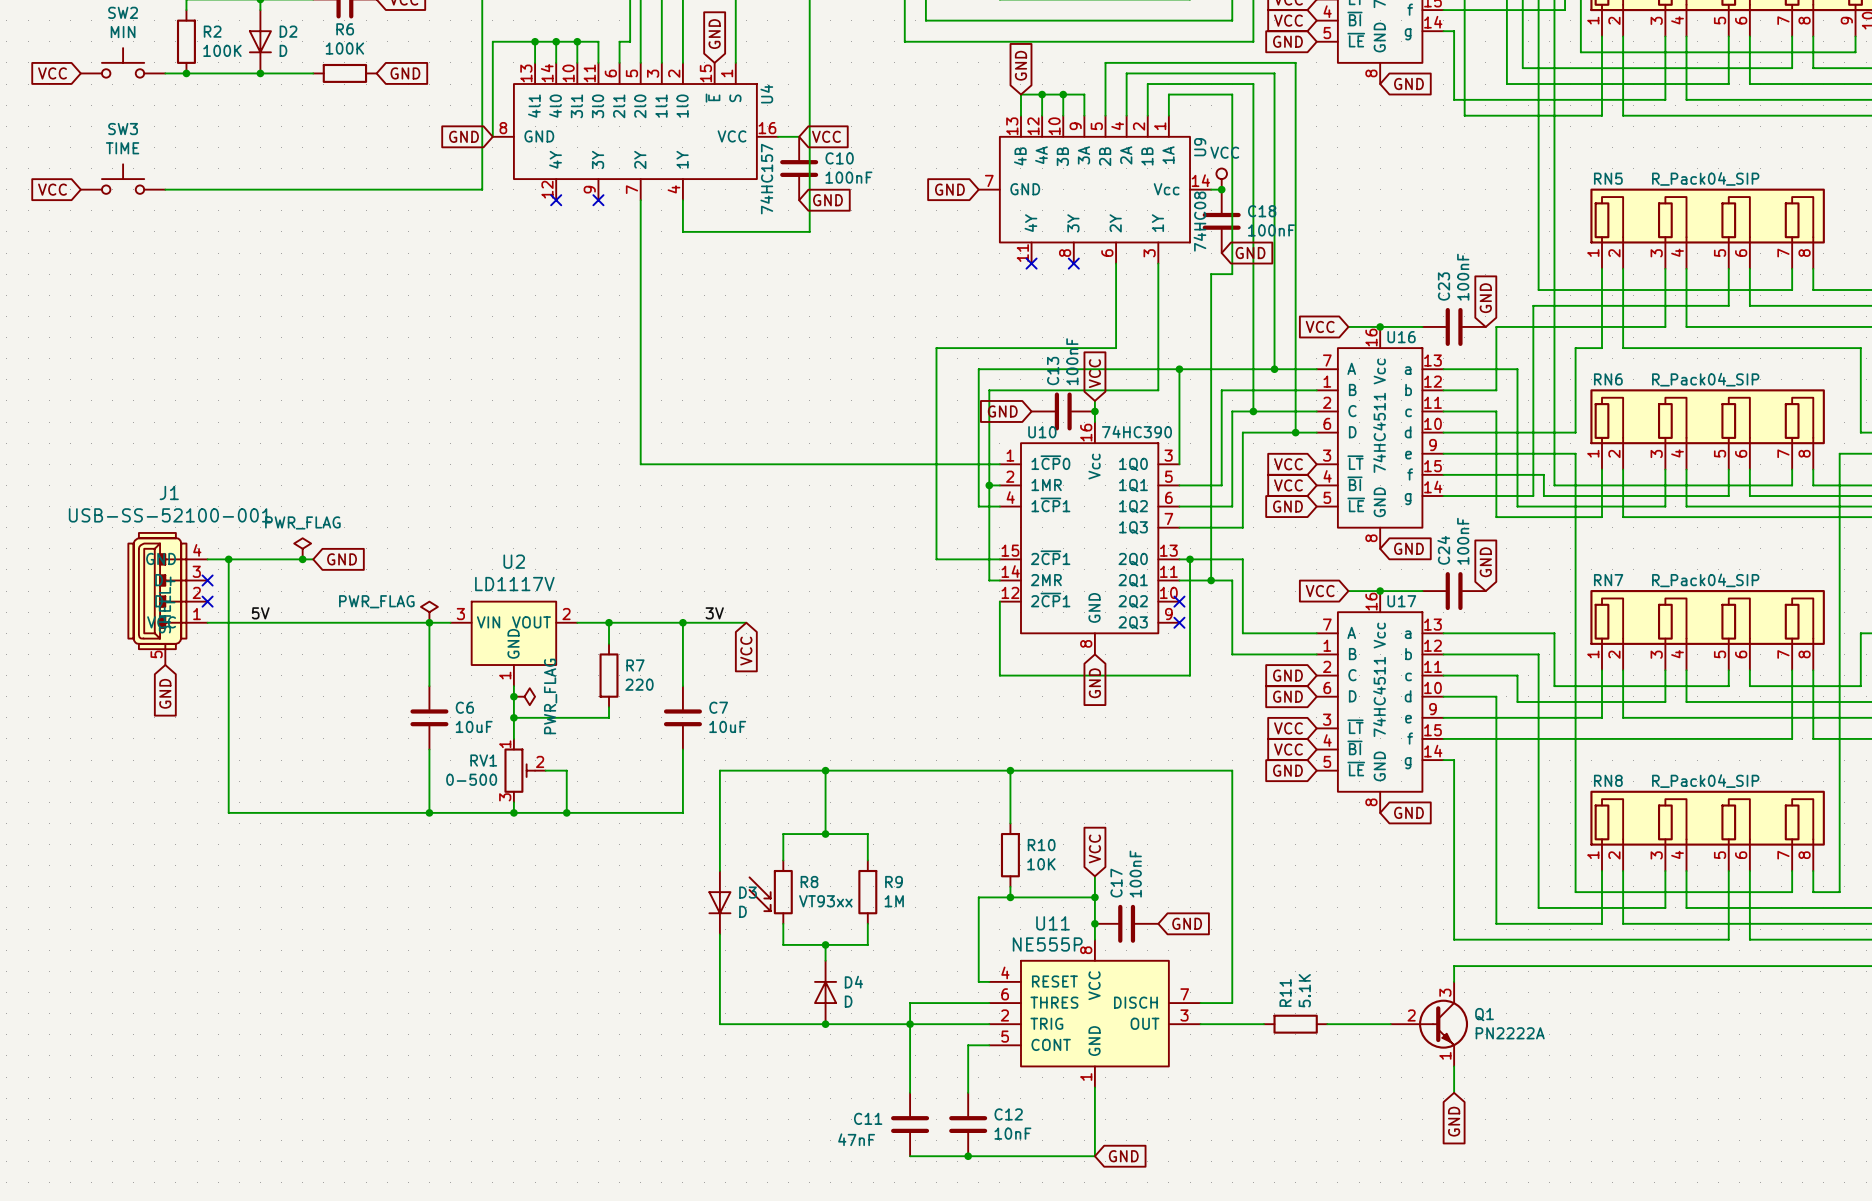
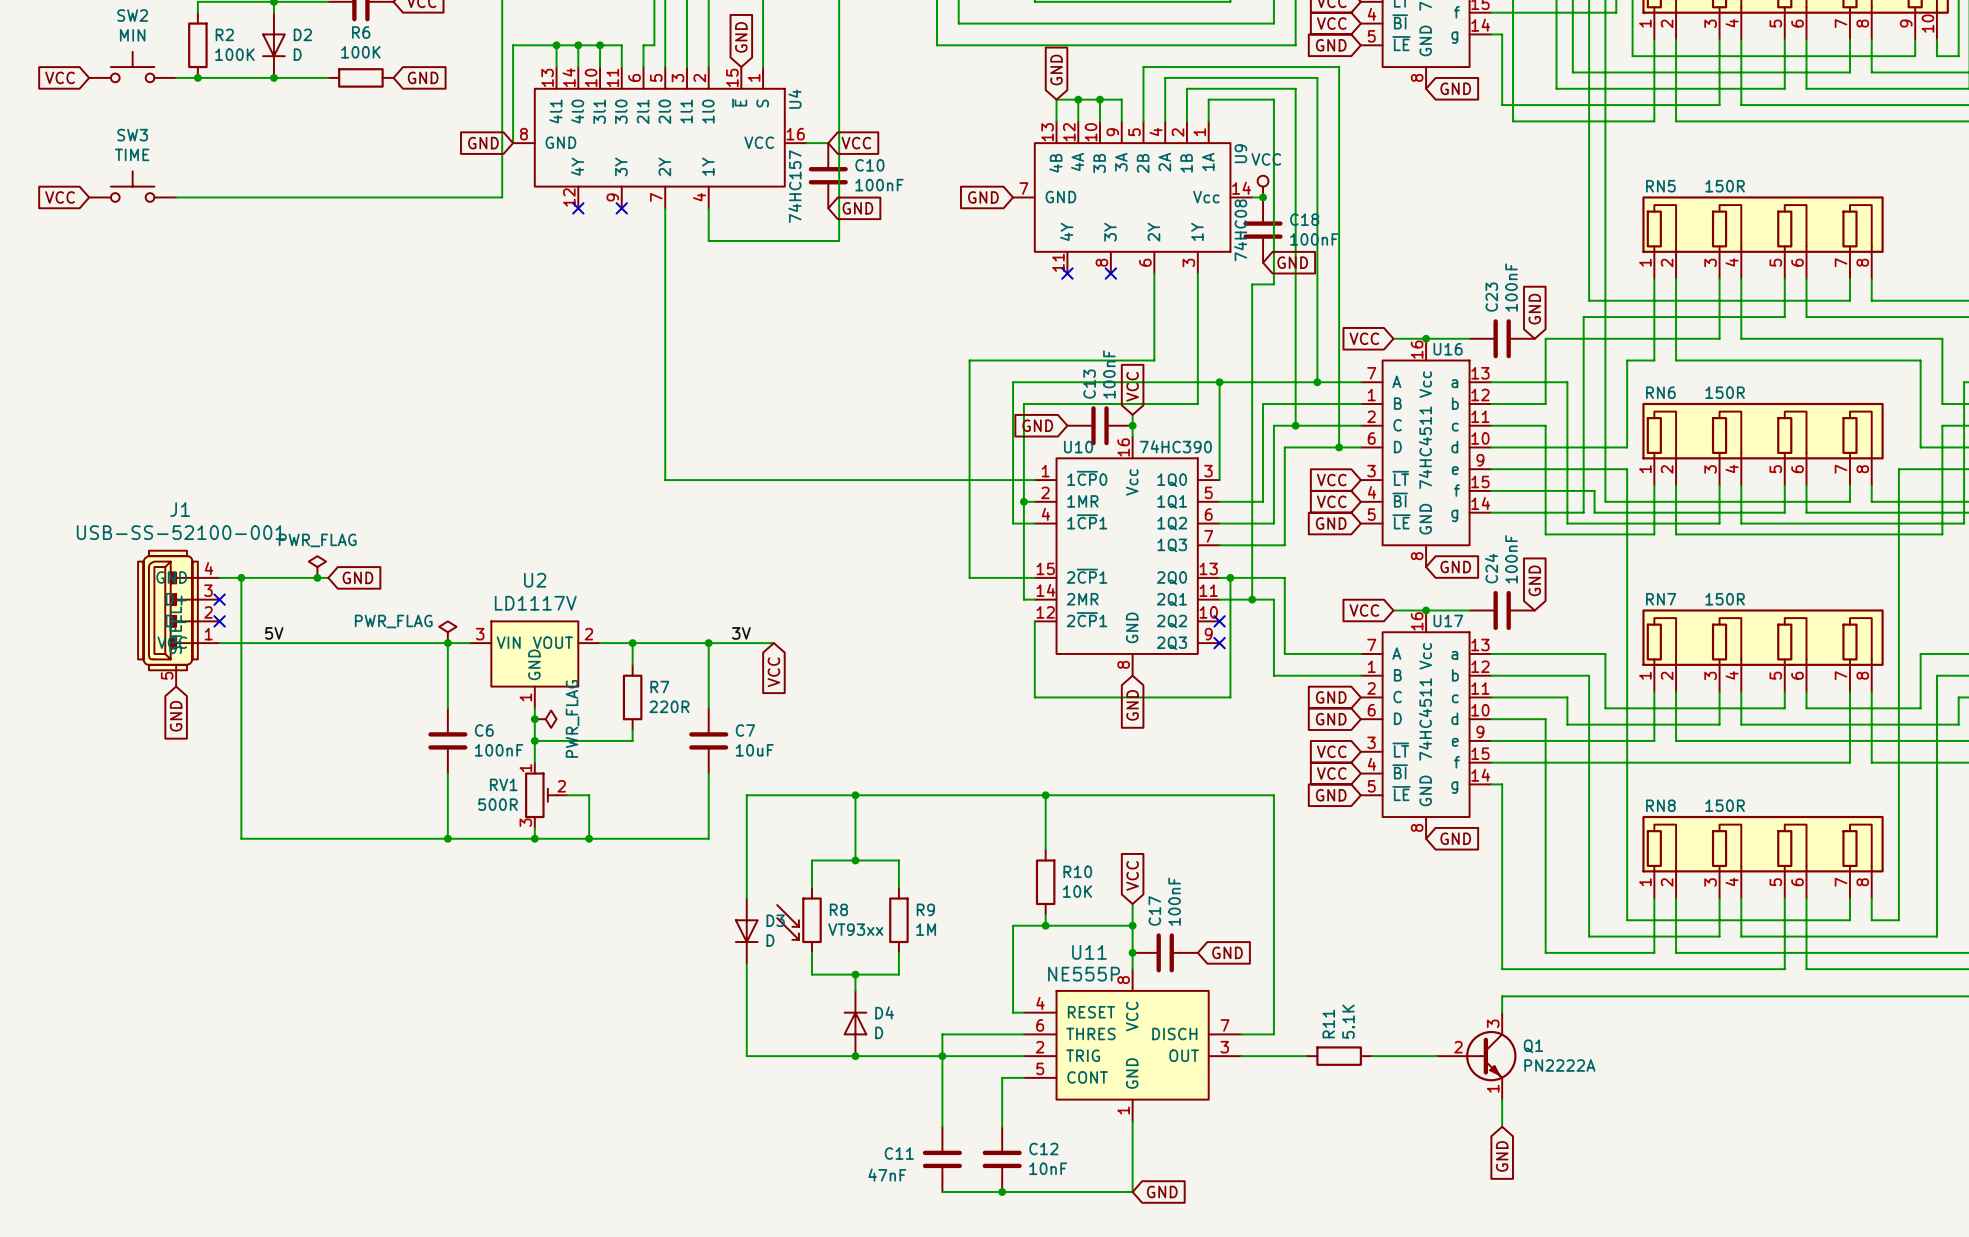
RN5 value: R_Pack04_SIP (1705, 178) -> 150R (1725, 186)
RN6 value: R_Pack04_SIP (1705, 379) -> 150R (1725, 392)
RN7 value: R_Pack04_SIP (1705, 580) -> 150R (1725, 599)
R7 value: 220 (639, 684) -> 220R (669, 706)
C6 value: 10uF (474, 726) -> 100nF (499, 750)
RV1 value: 0-500 (471, 779) -> 500R (497, 804)
RN8 value: R_Pack04_SIP (1705, 781) -> 150R (1725, 805)

